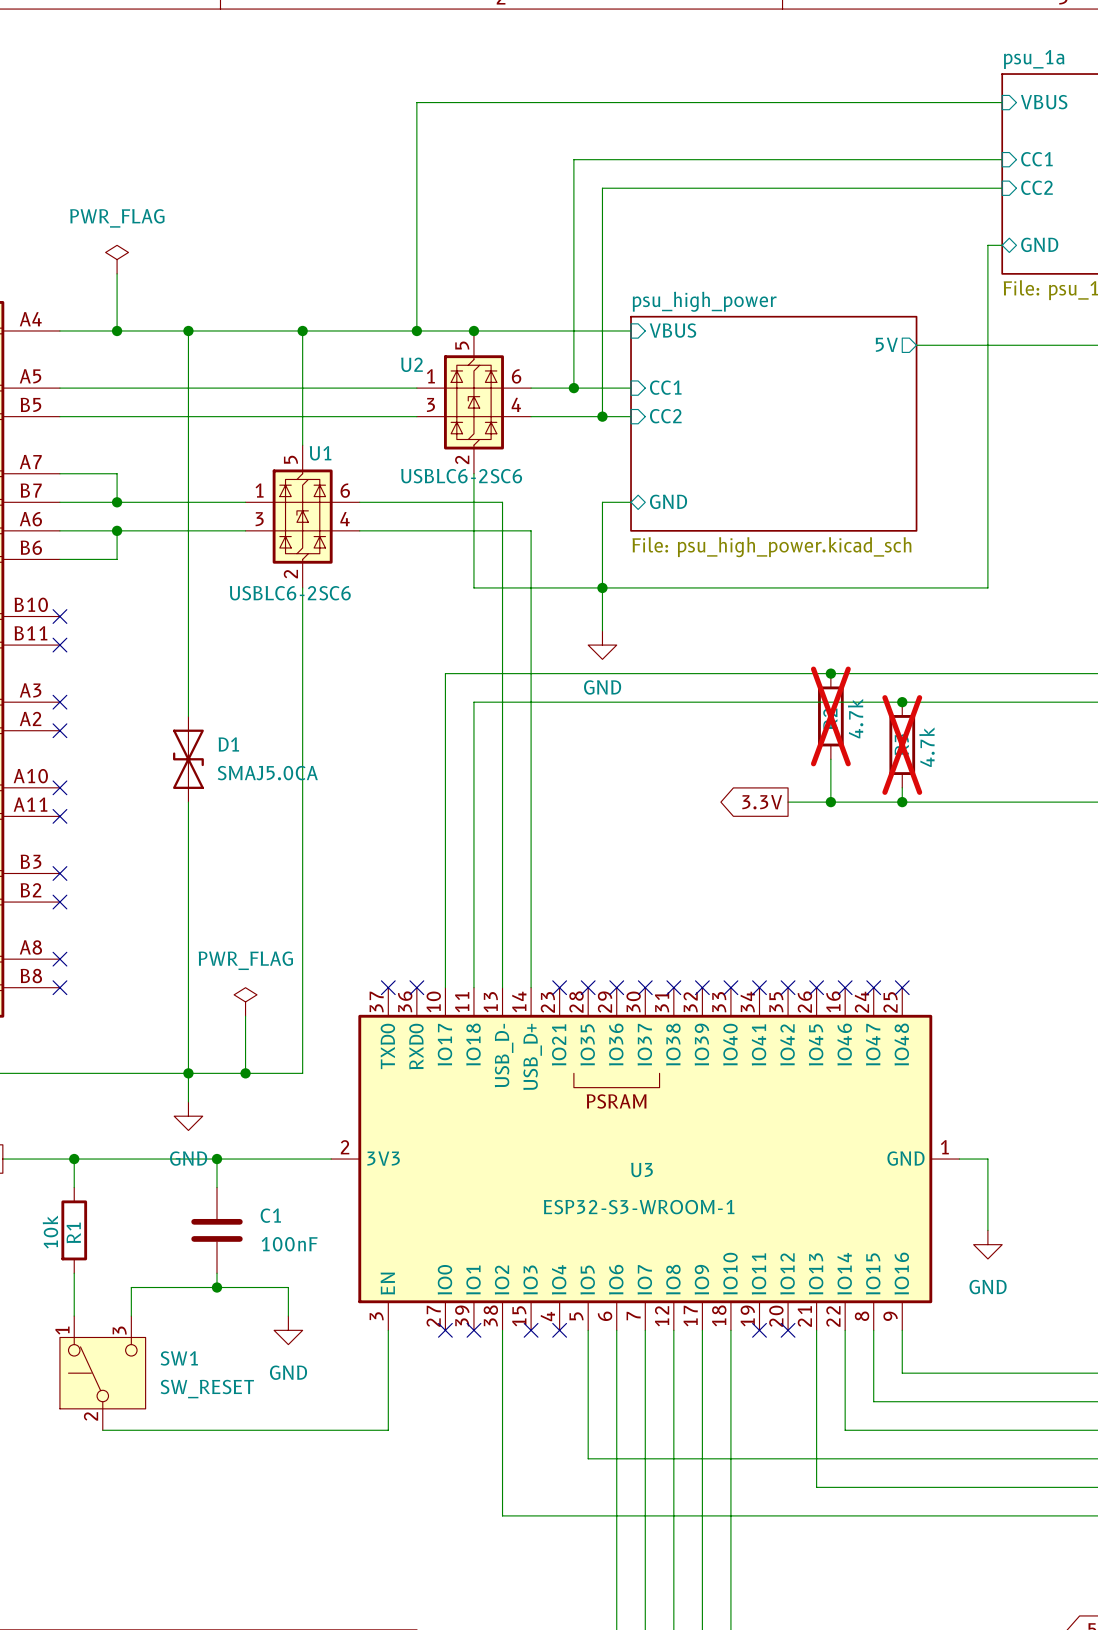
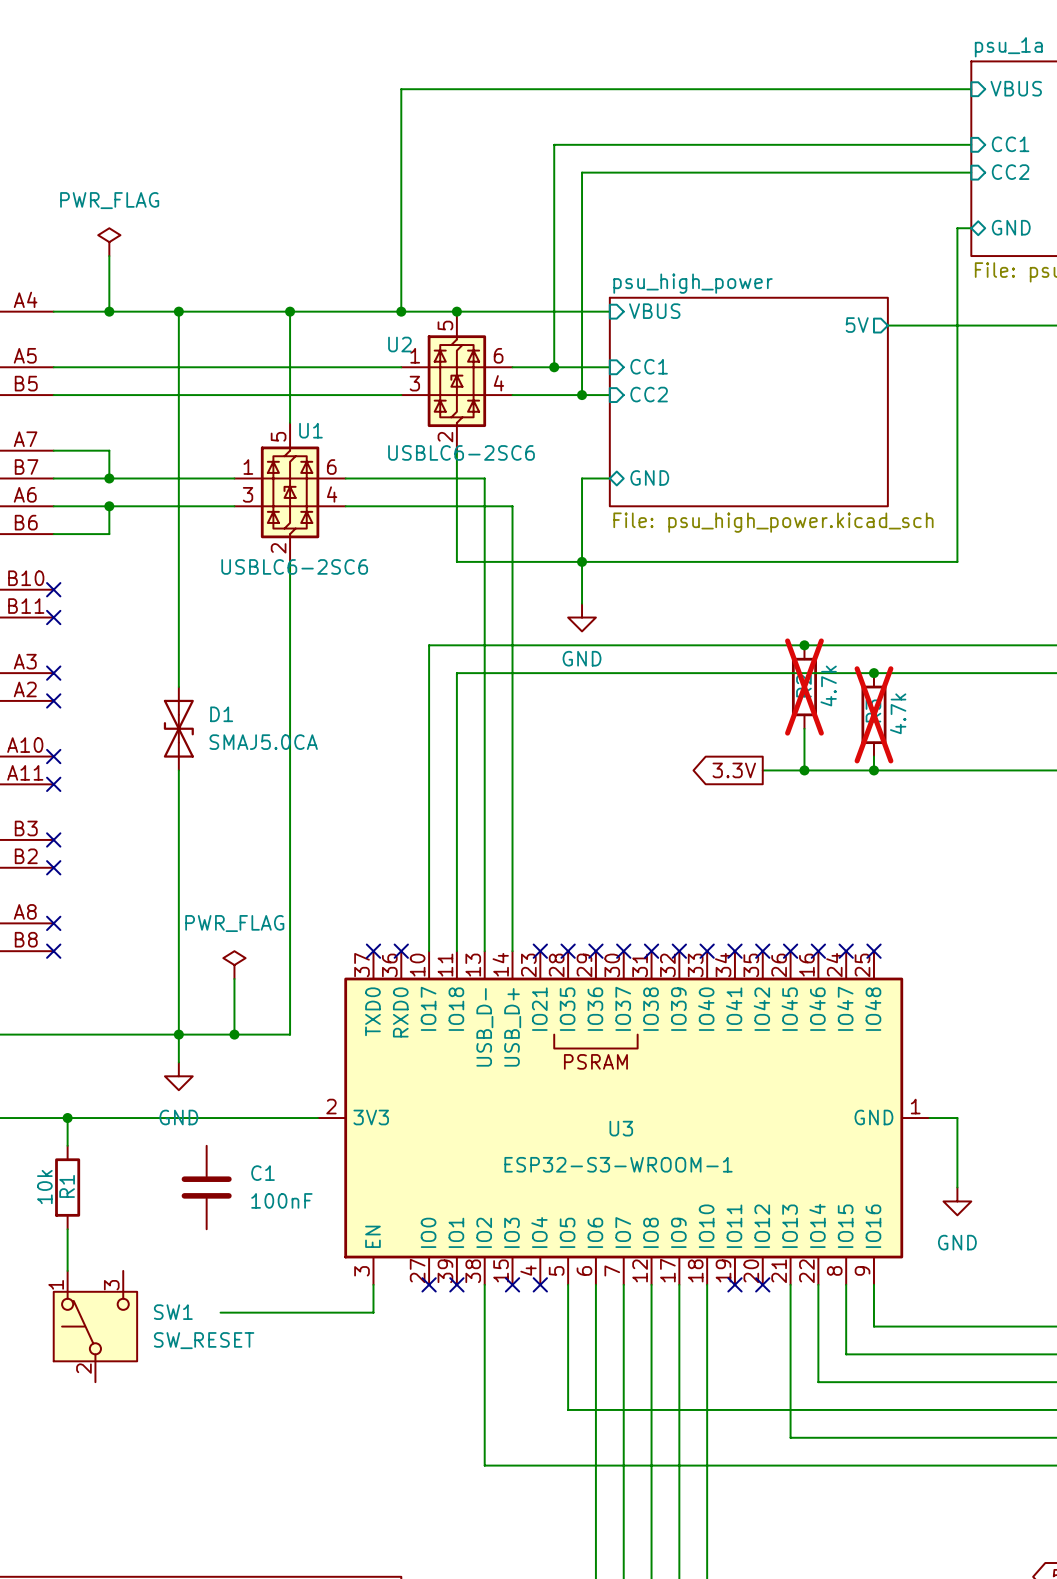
wire: (217, 1159) (217, 1187) -> none
junction: (217, 1159) -> none
wire: (217, 1273) (217, 1287) -> none
junction: (217, 1287) -> none
wire: (131, 1316) (131, 1287) (288, 1287) (288, 1316) -> none
power symbol: GND (288, 1330) -> none
wire: (388, 1358) (388, 1430) (102, 1430) -> (373, 1312) (220, 1312)

